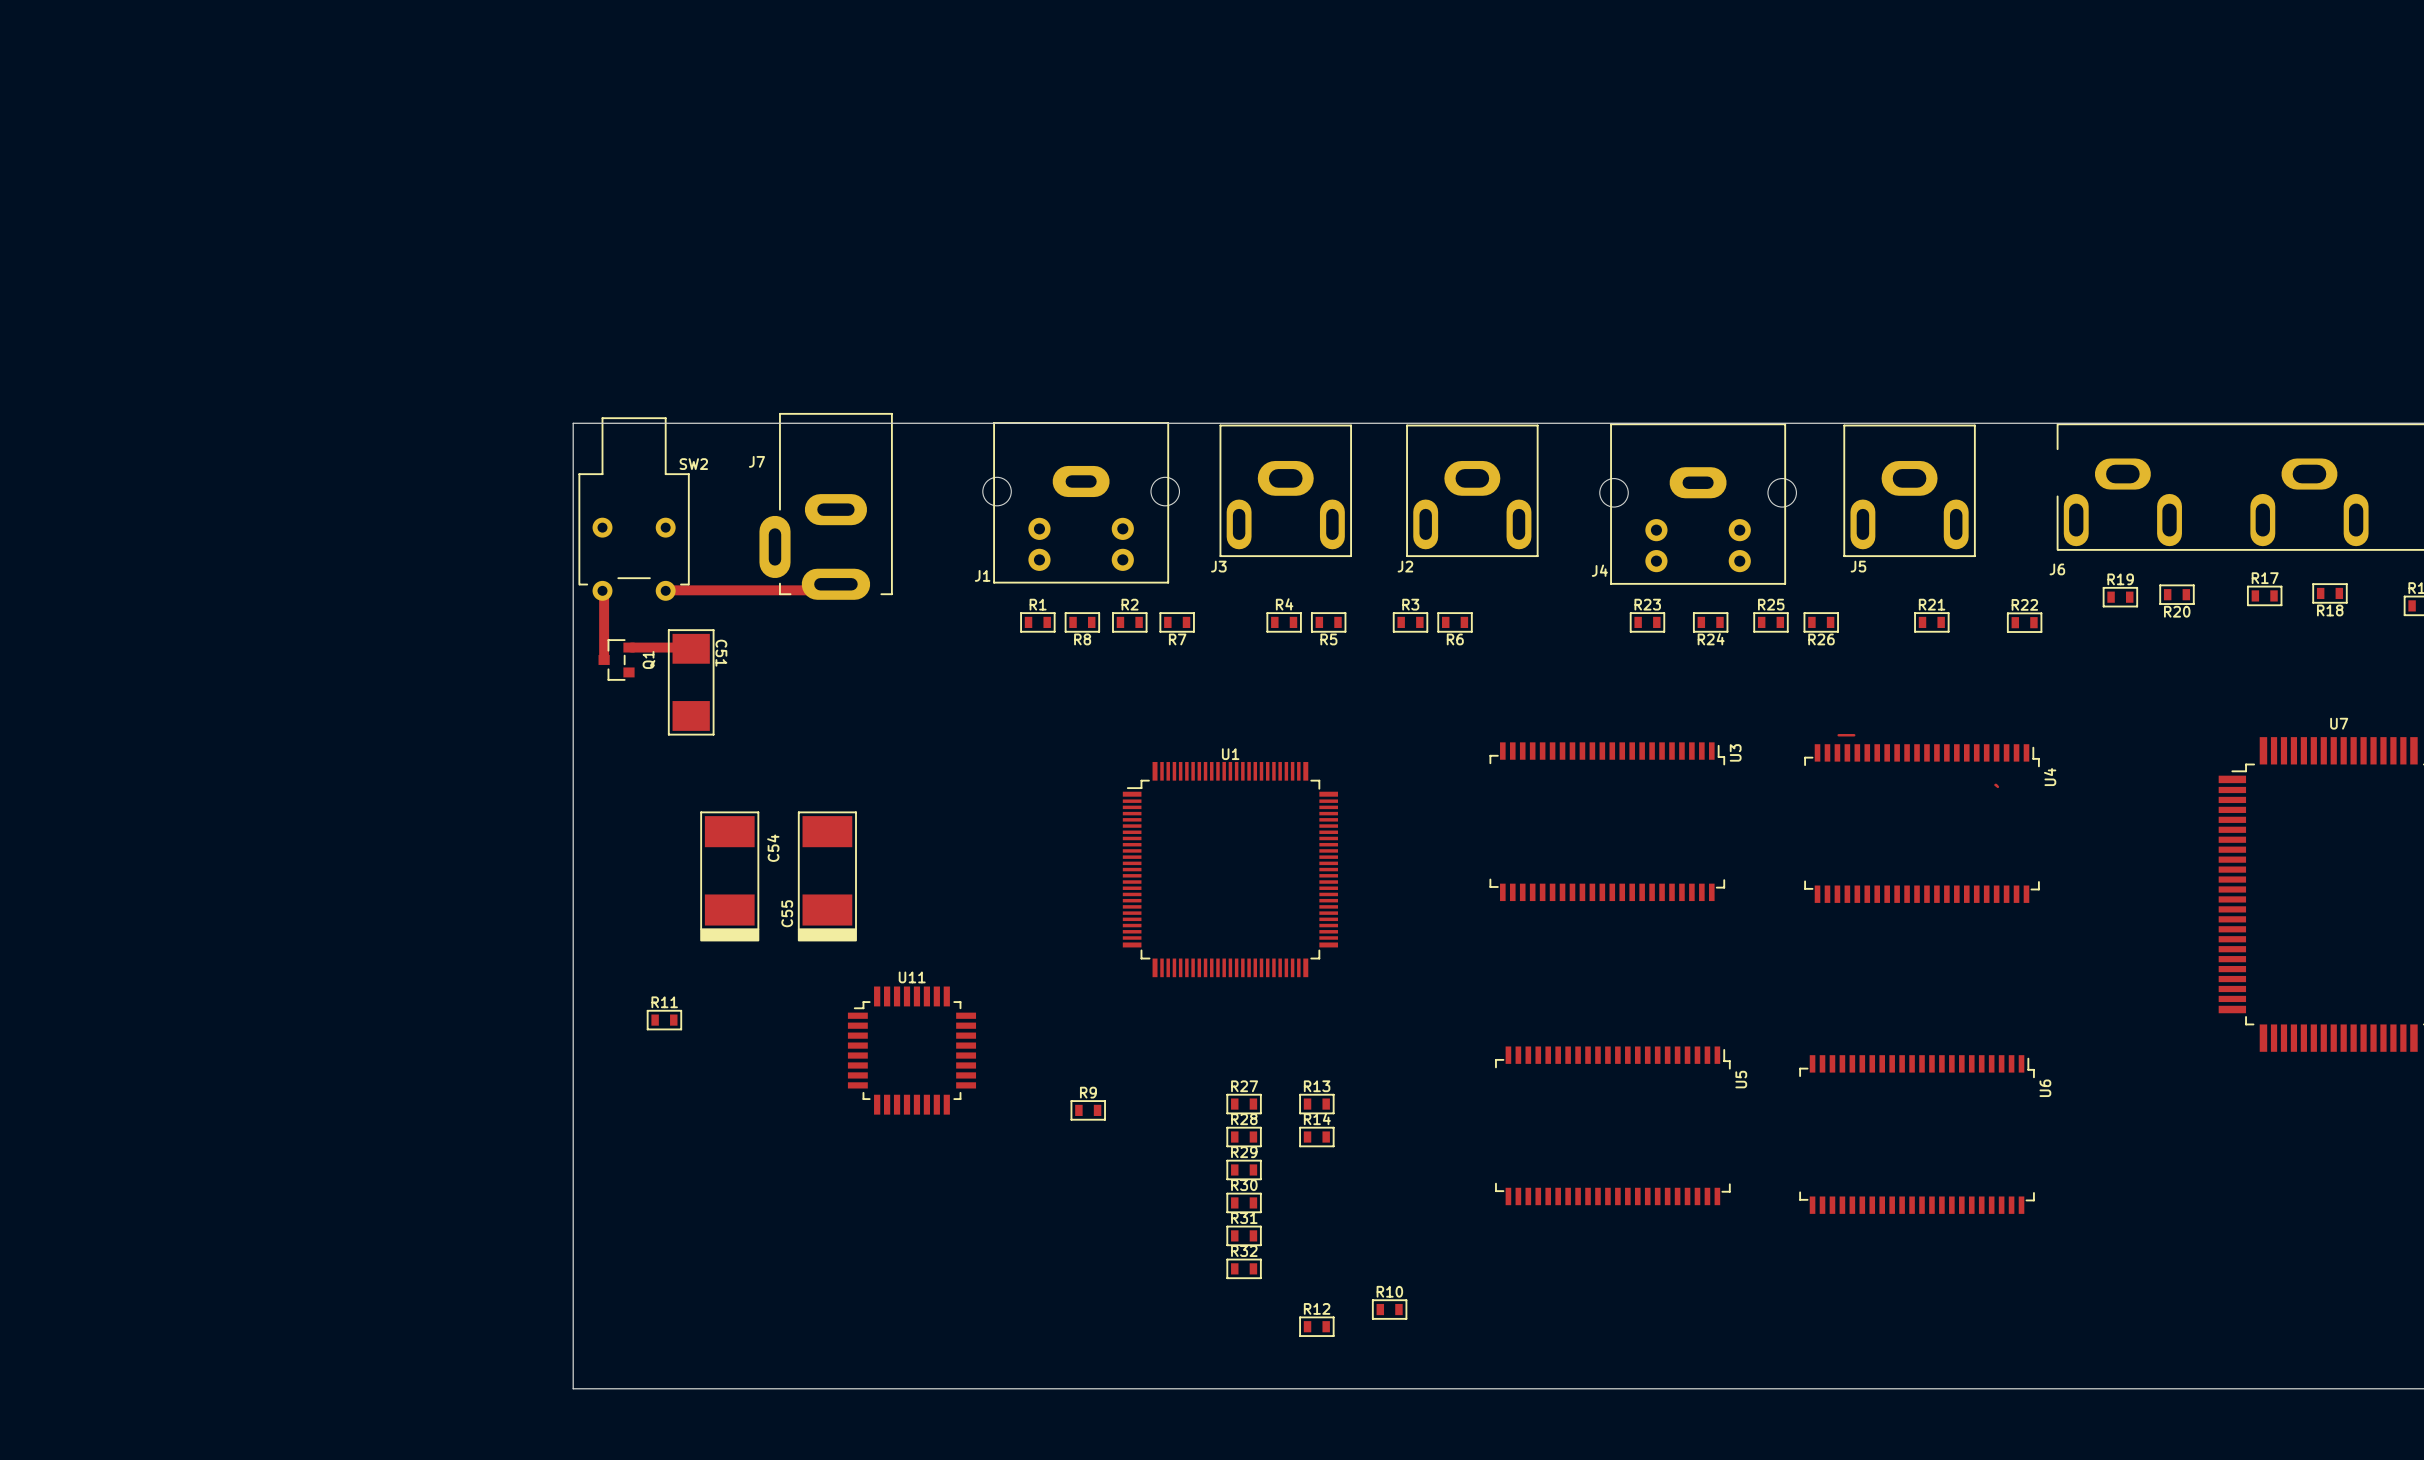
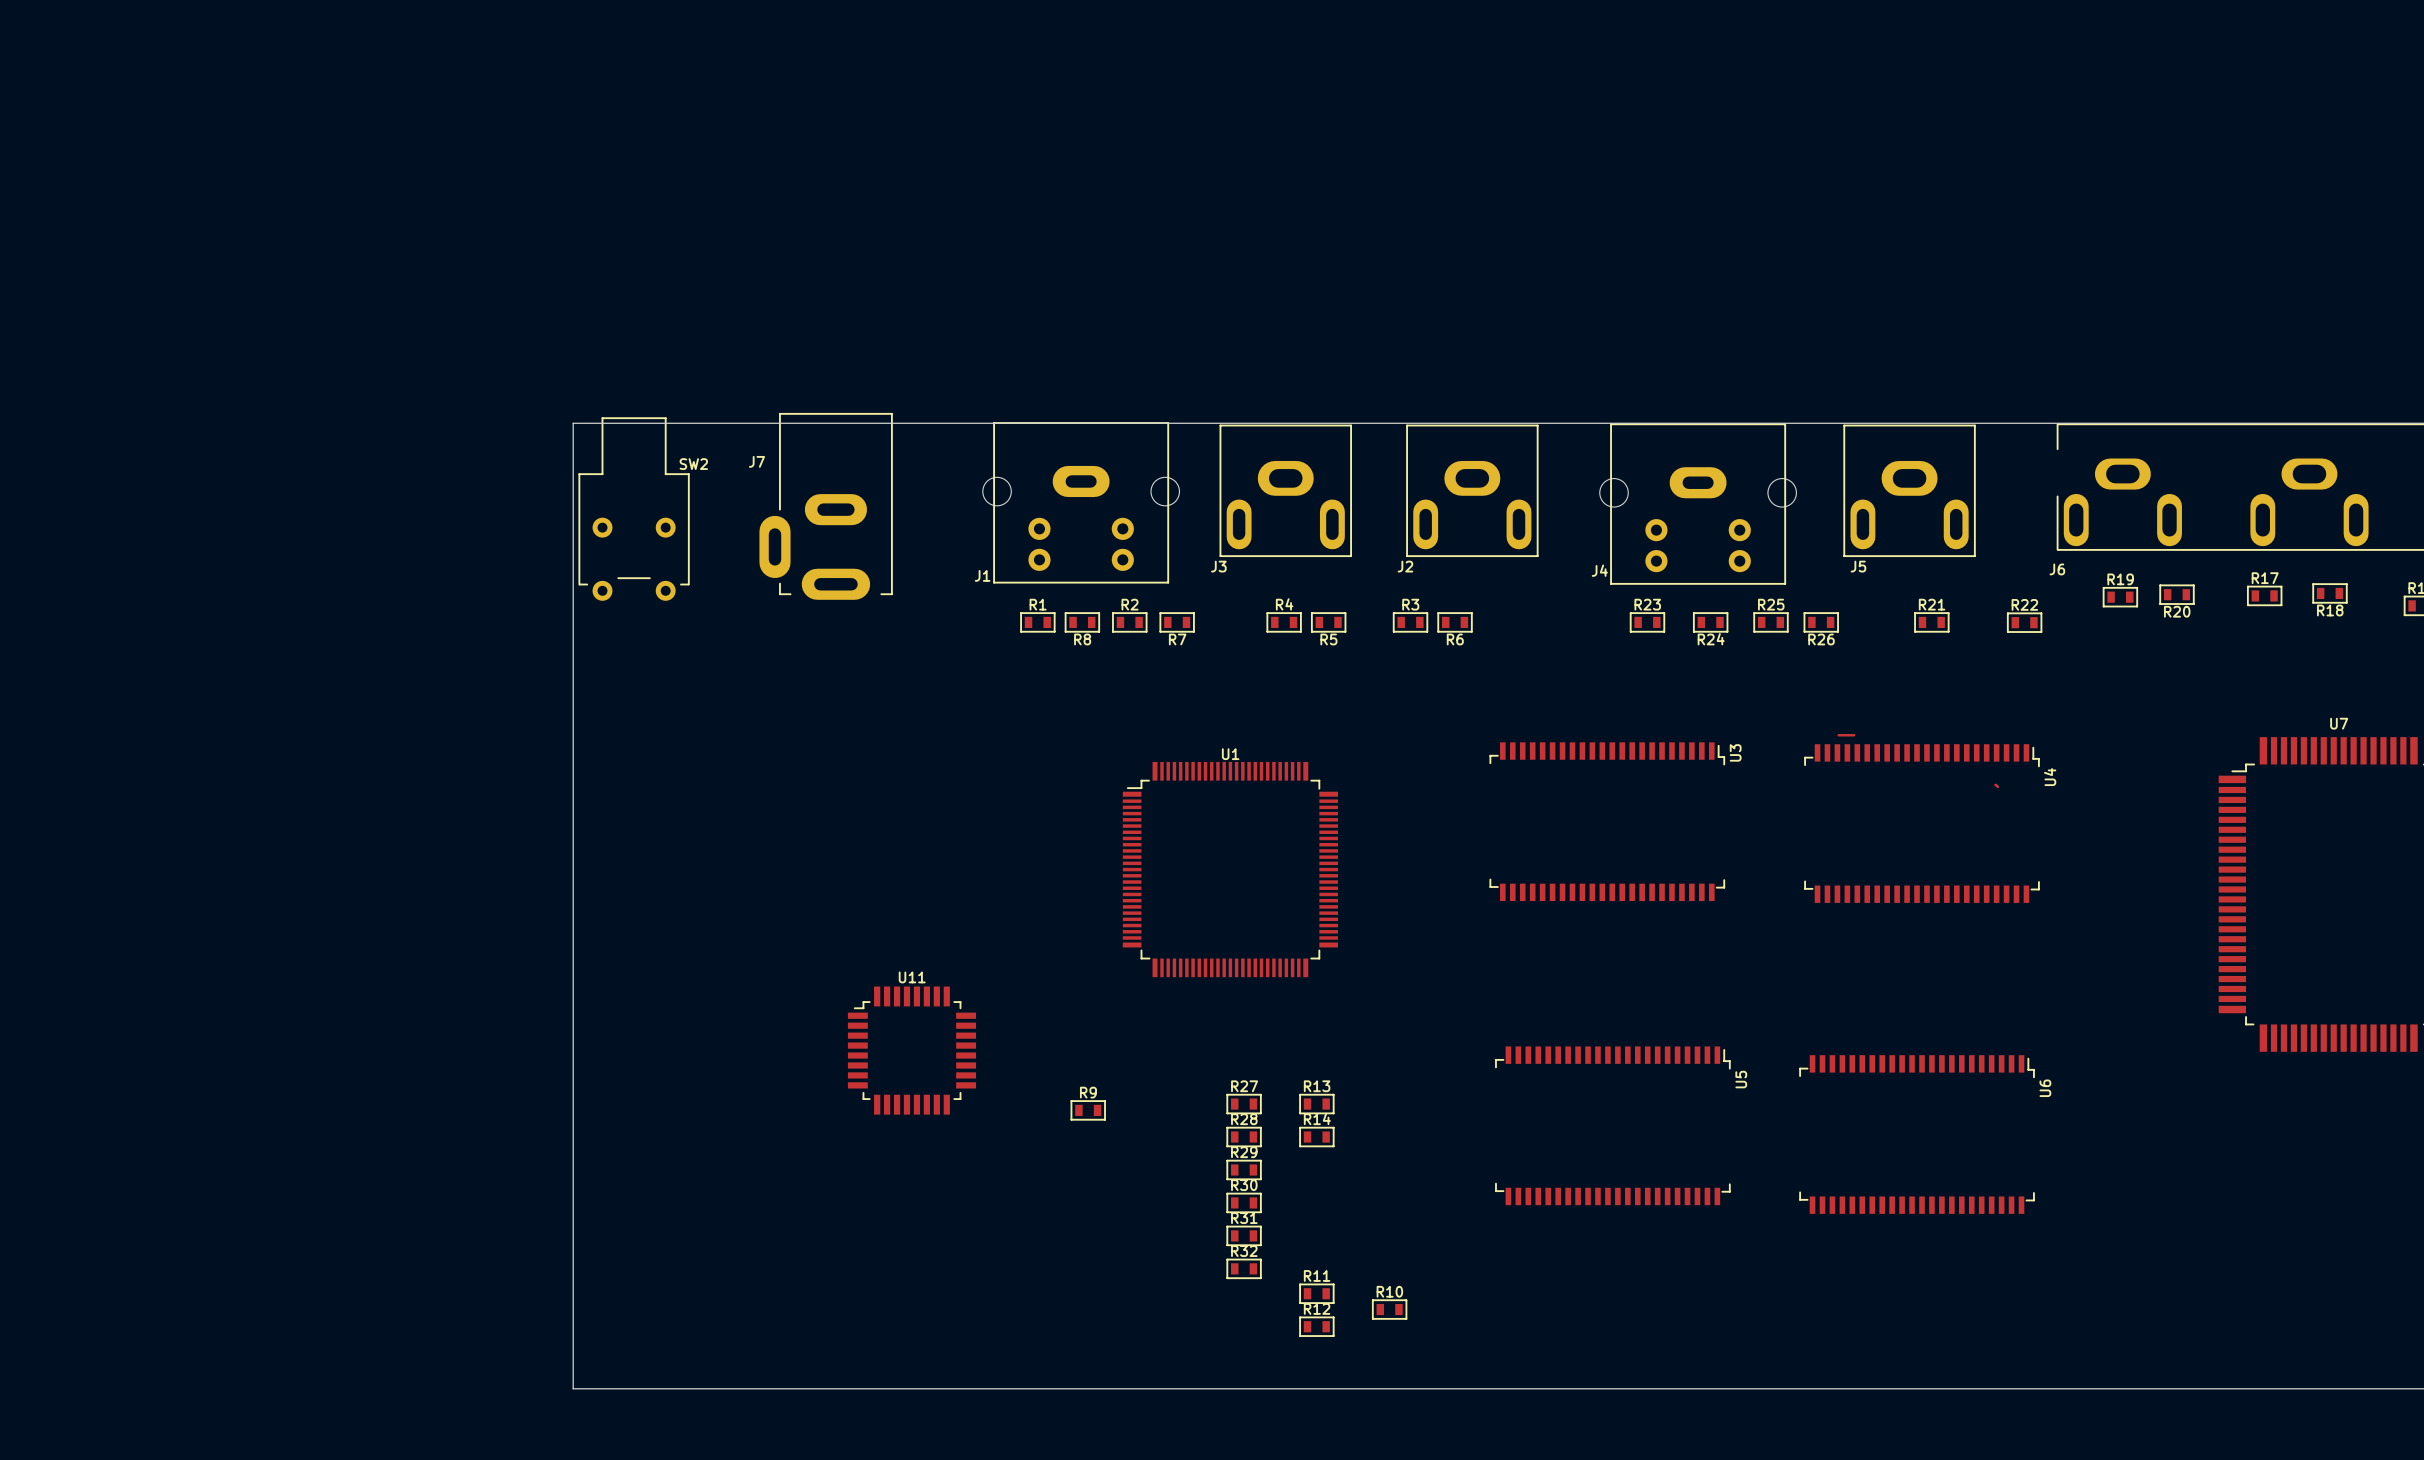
track: (835, 584) (829, 590) (665, 590) -> none
track: (602, 590) (604, 592) (604, 656) -> none
track: (631, 647) (691, 648) -> none
Q1: (616, 659) -> none
C51: (691, 682) -> none
C54: (729, 876) -> none
C55: (827, 876) -> none
R11 position: (664, 1020) -> (1316, 1293)

